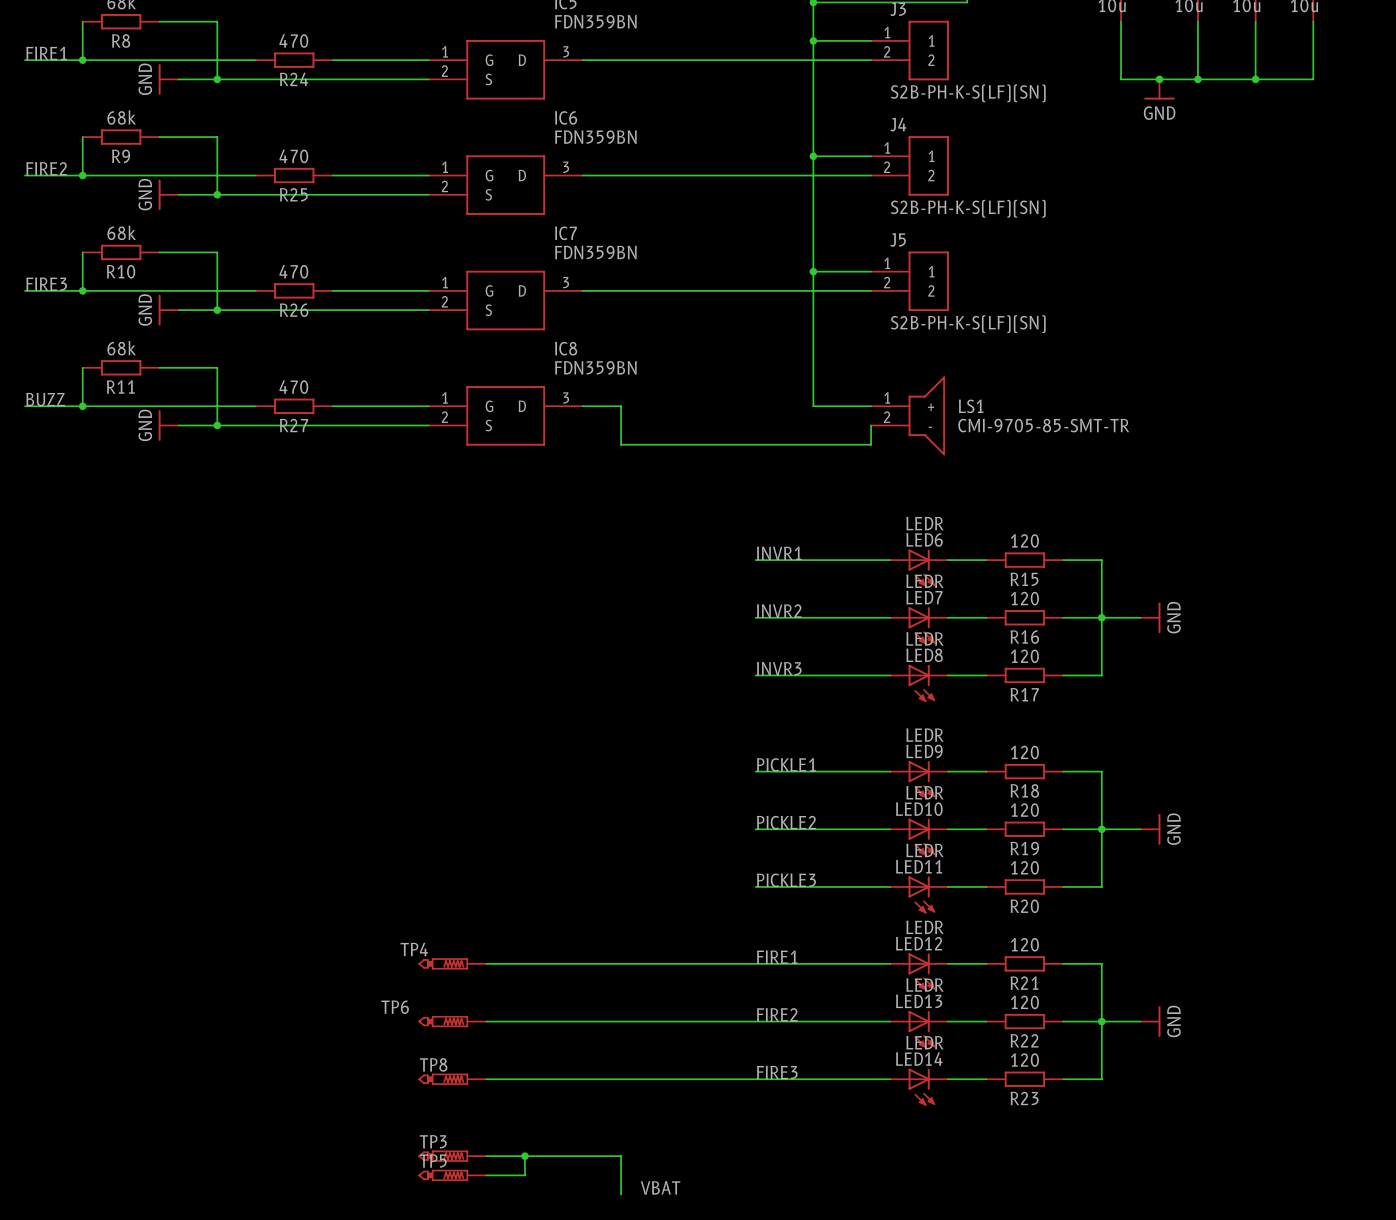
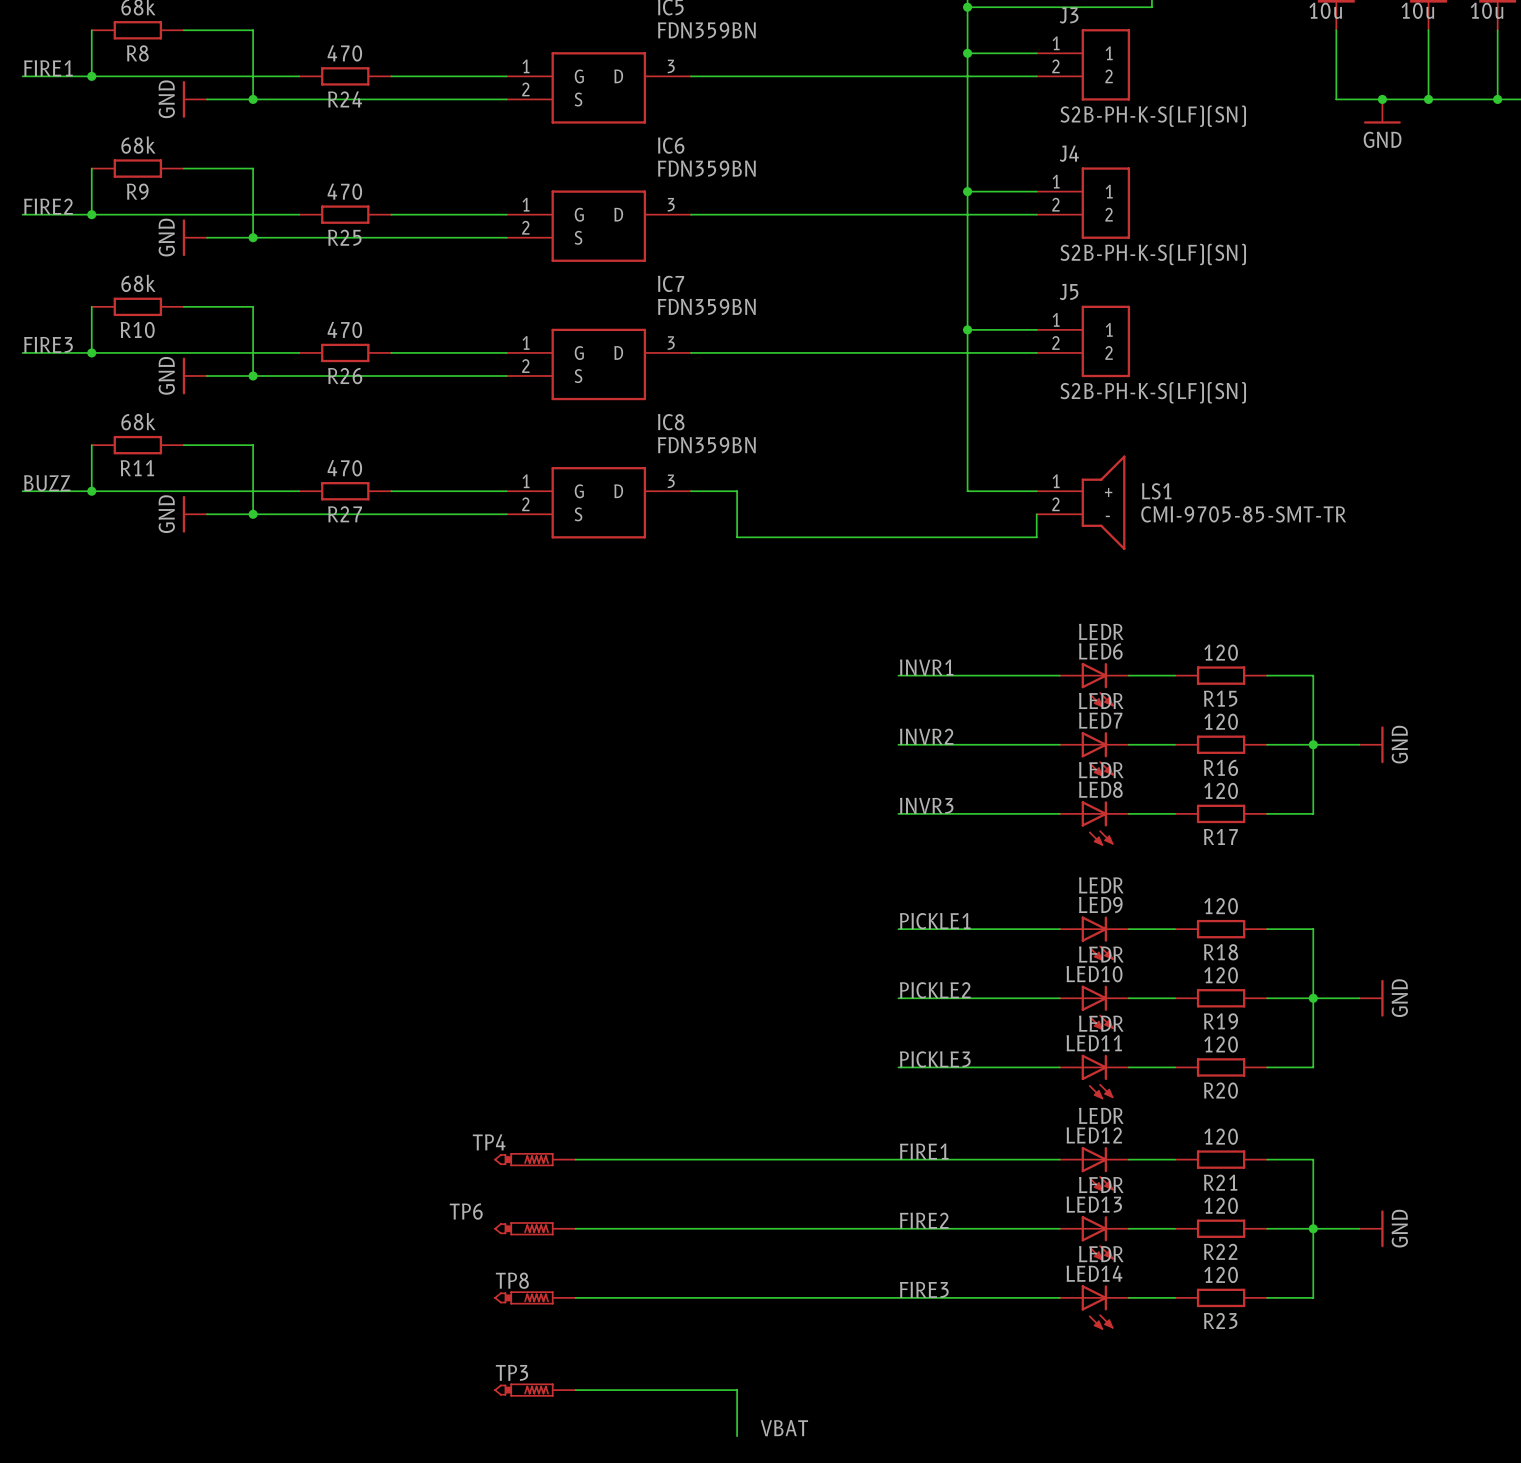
wire: (524, 1156) (524, 1175) (486, 1175) -> none
junction: (524, 1156) -> none
TP5: (452, 1175) -> none

